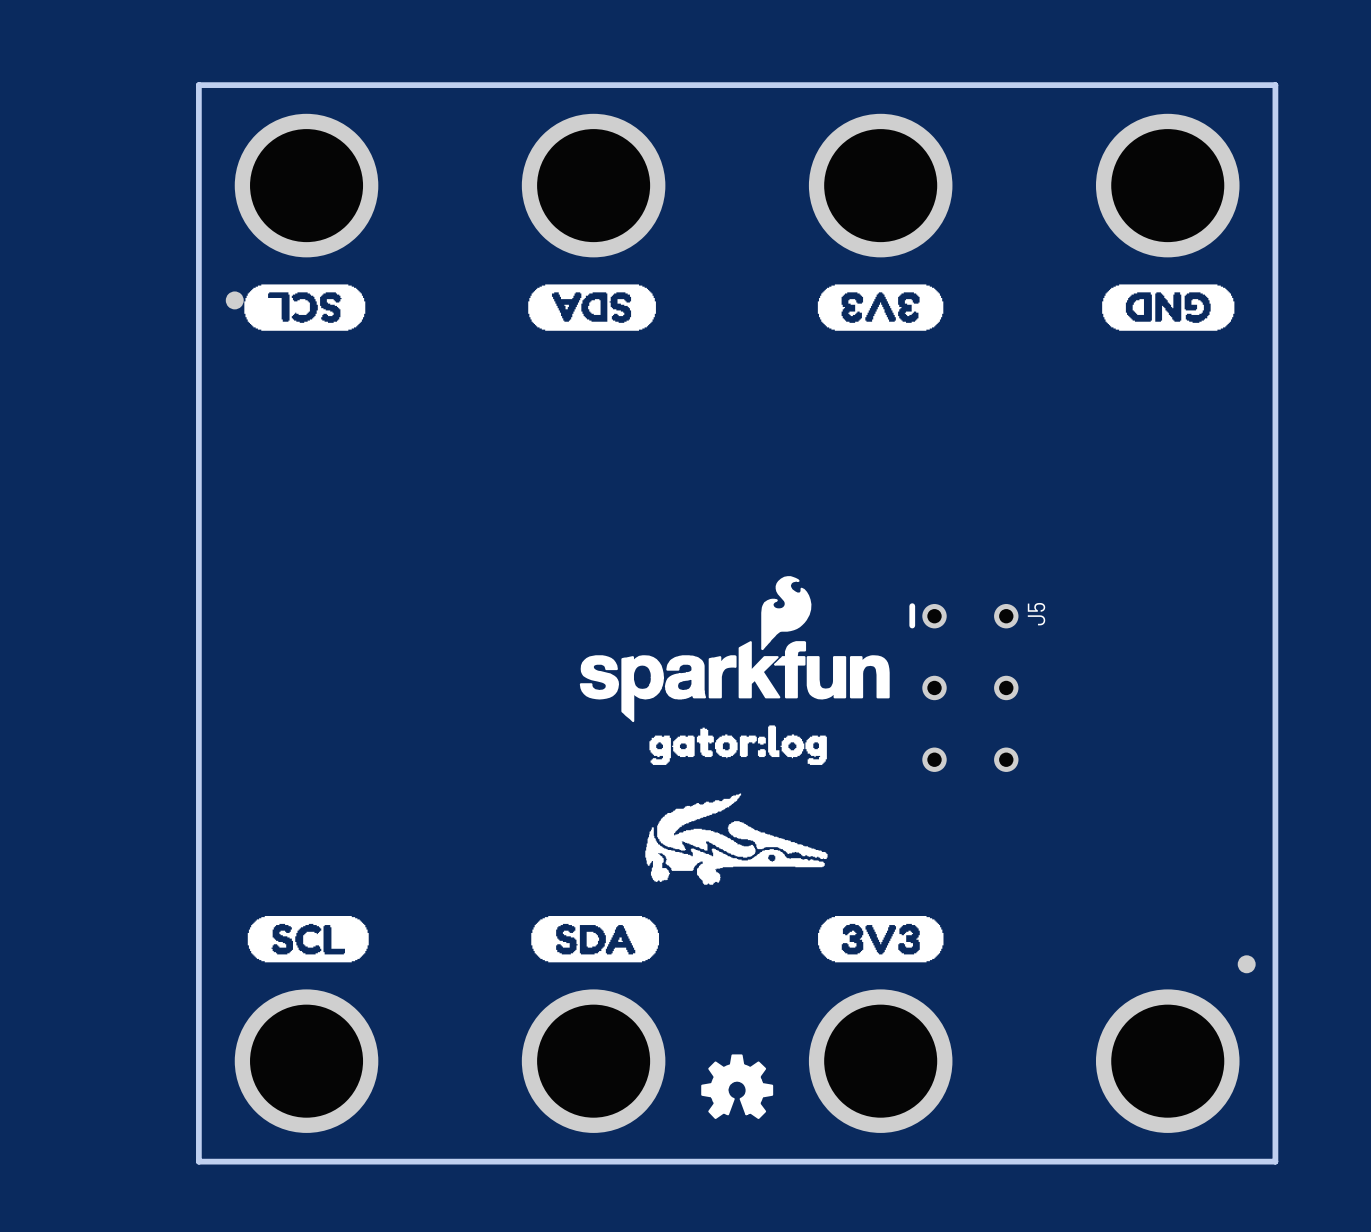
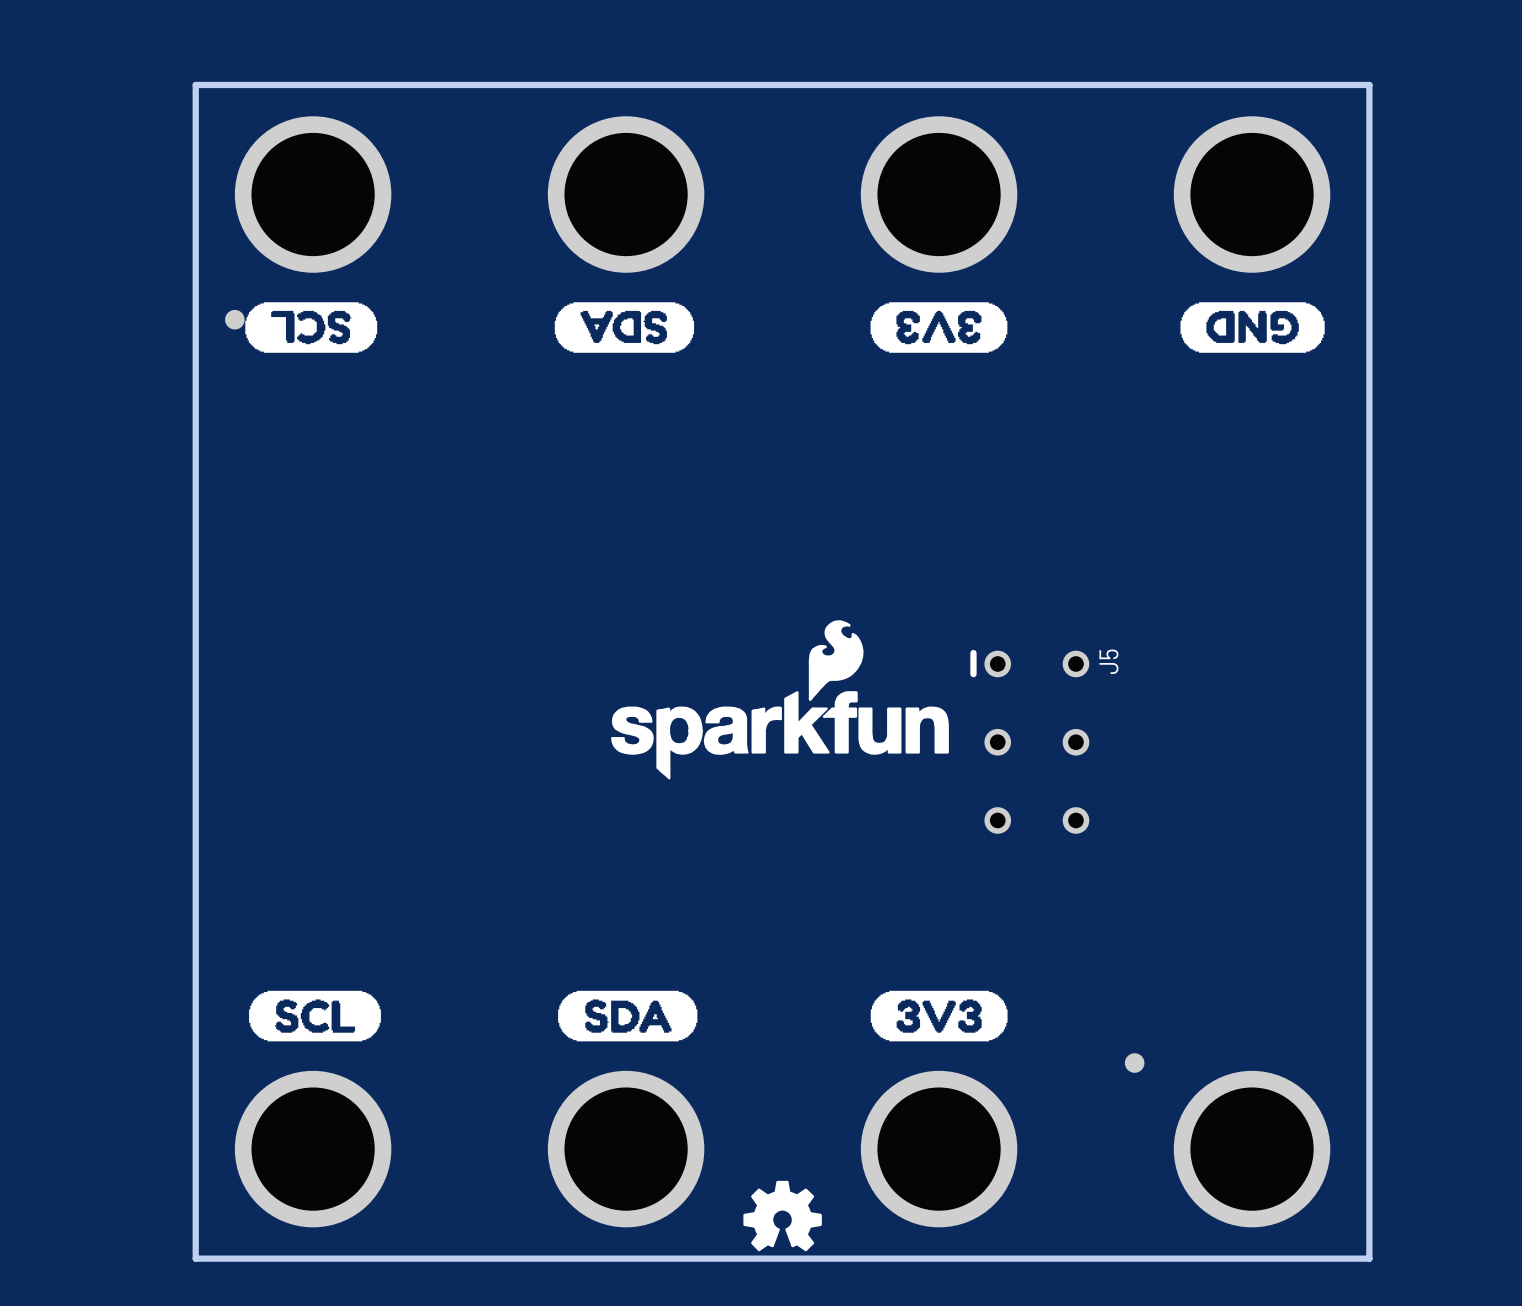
drawing: [645, 725, 828, 885] -> none
part position: (1246, 964) -> (1134, 1063)
drawing position: (737, 1086) -> (782, 1216)

